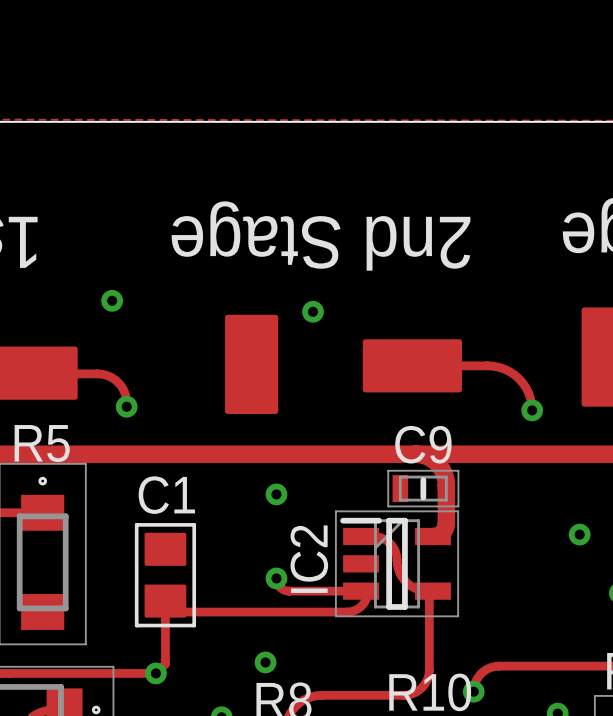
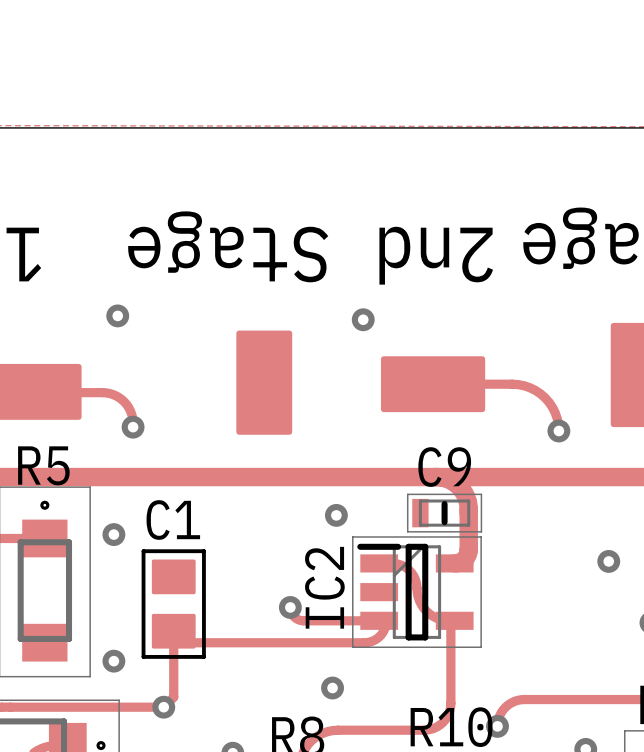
via position: (313, 311) -> (363, 319)
via position: (276, 494) -> (336, 515)
via: none -> (113, 534)
via: none -> (113, 661)
via position: (265, 662) -> (332, 688)

